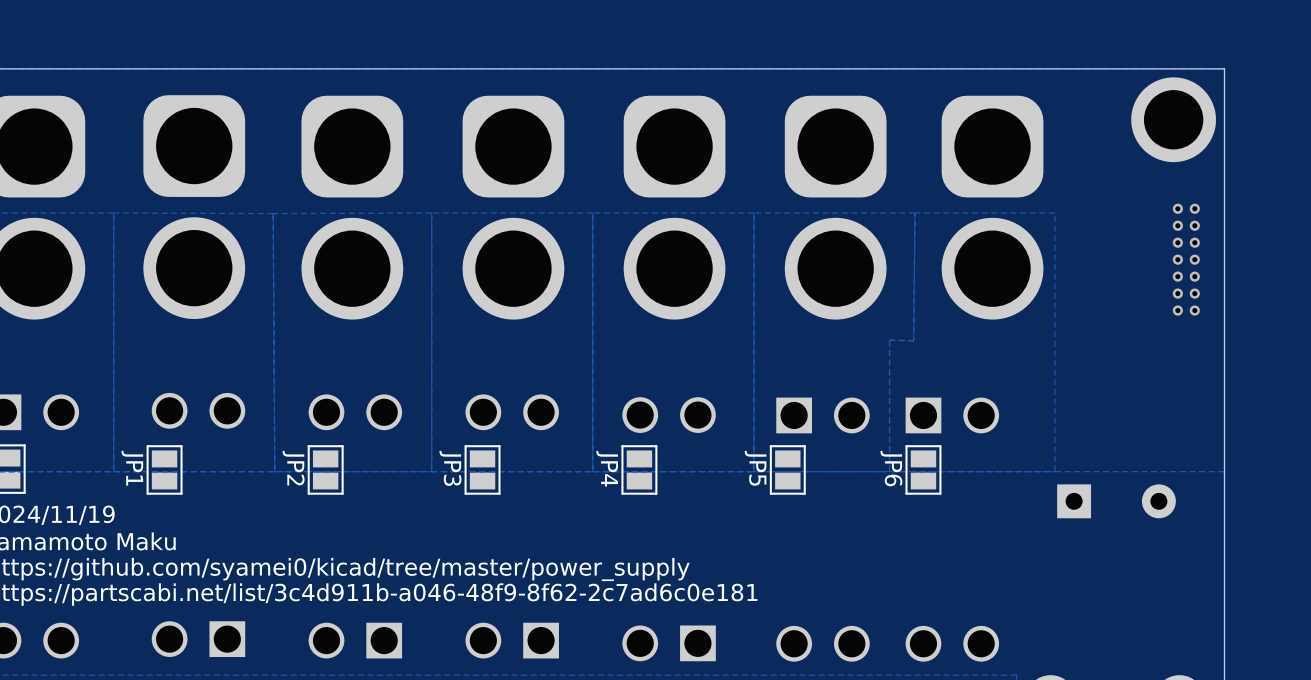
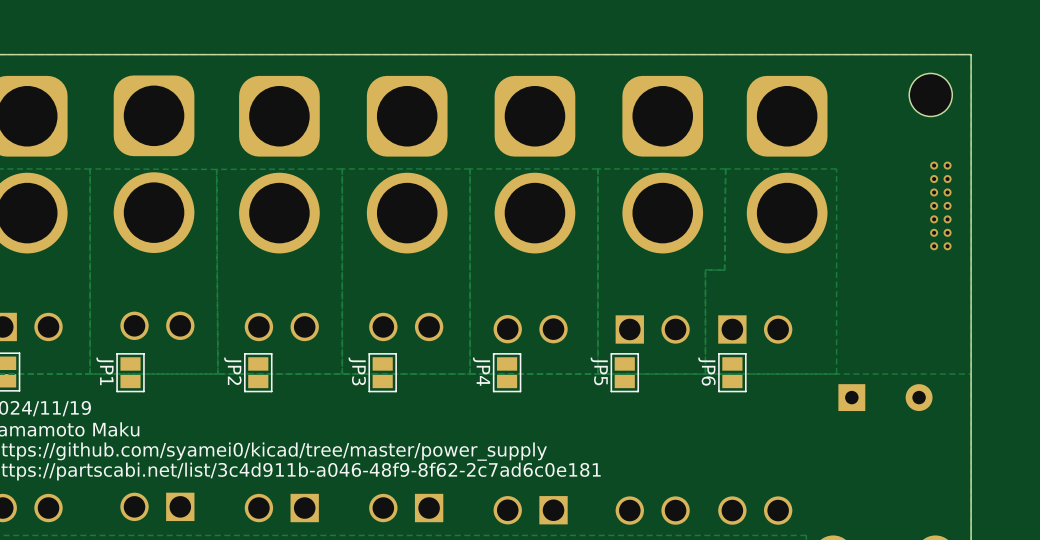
part footprint: [1131, 77, 1217, 163] -> [909, 73, 953, 117]

